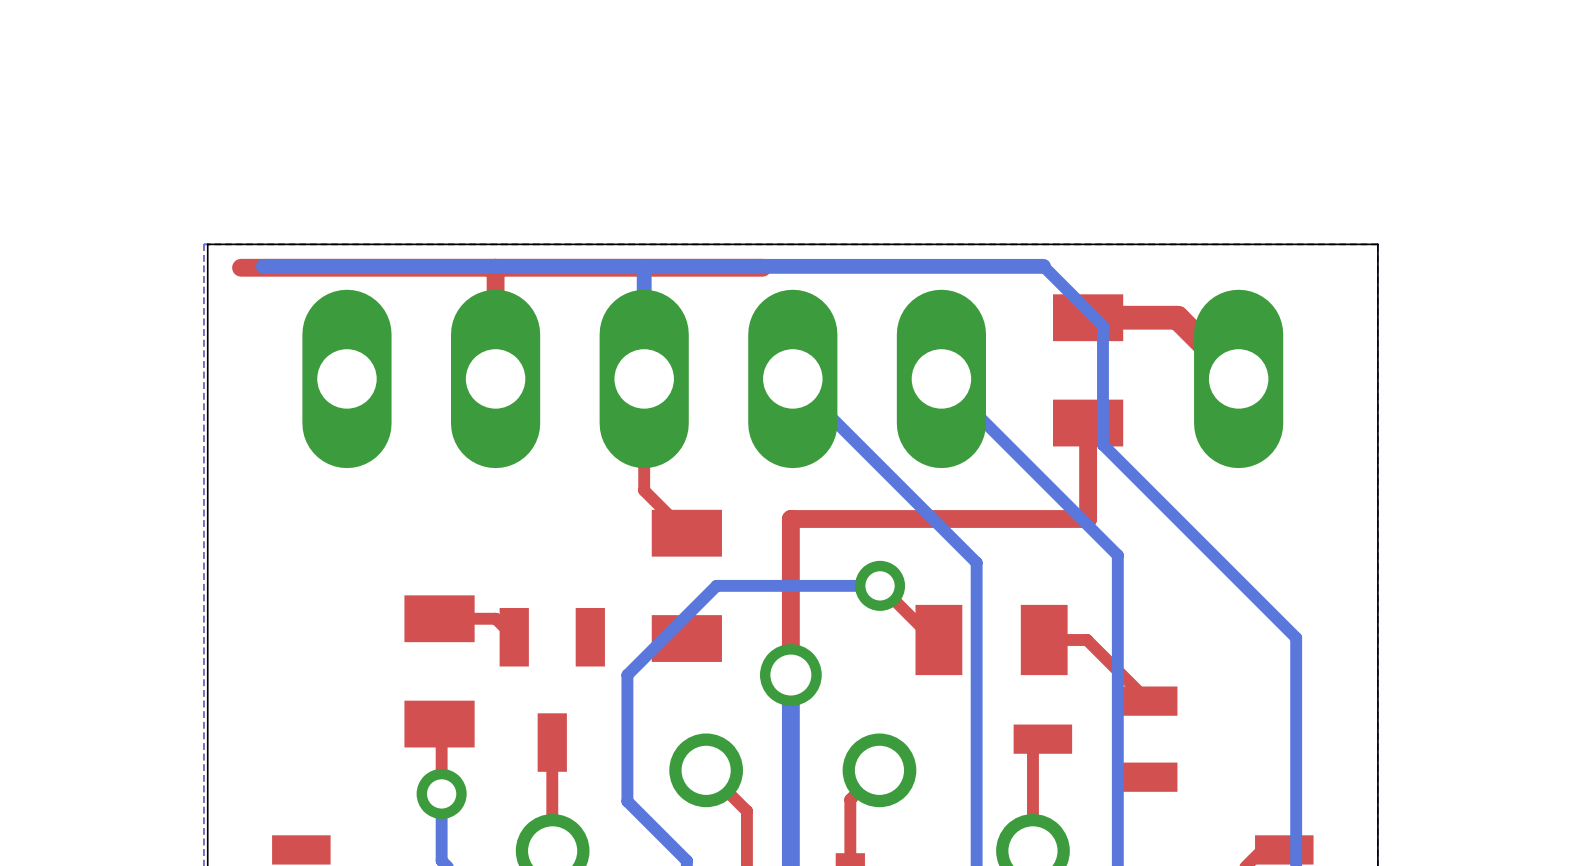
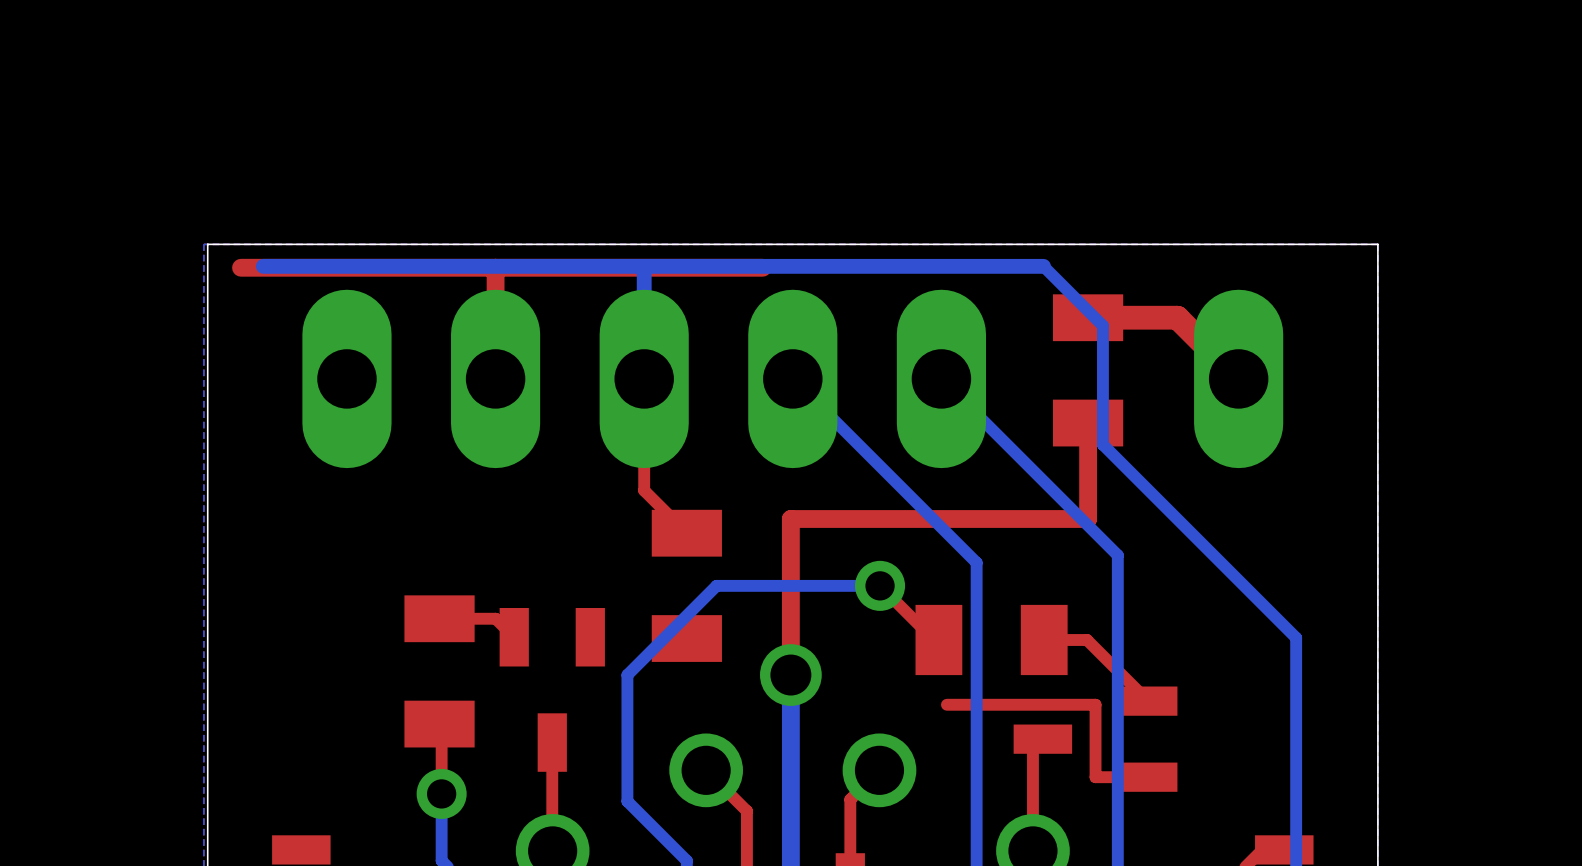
top track: none -> (946, 704) (1095, 704) (1095, 777) (1148, 777)

